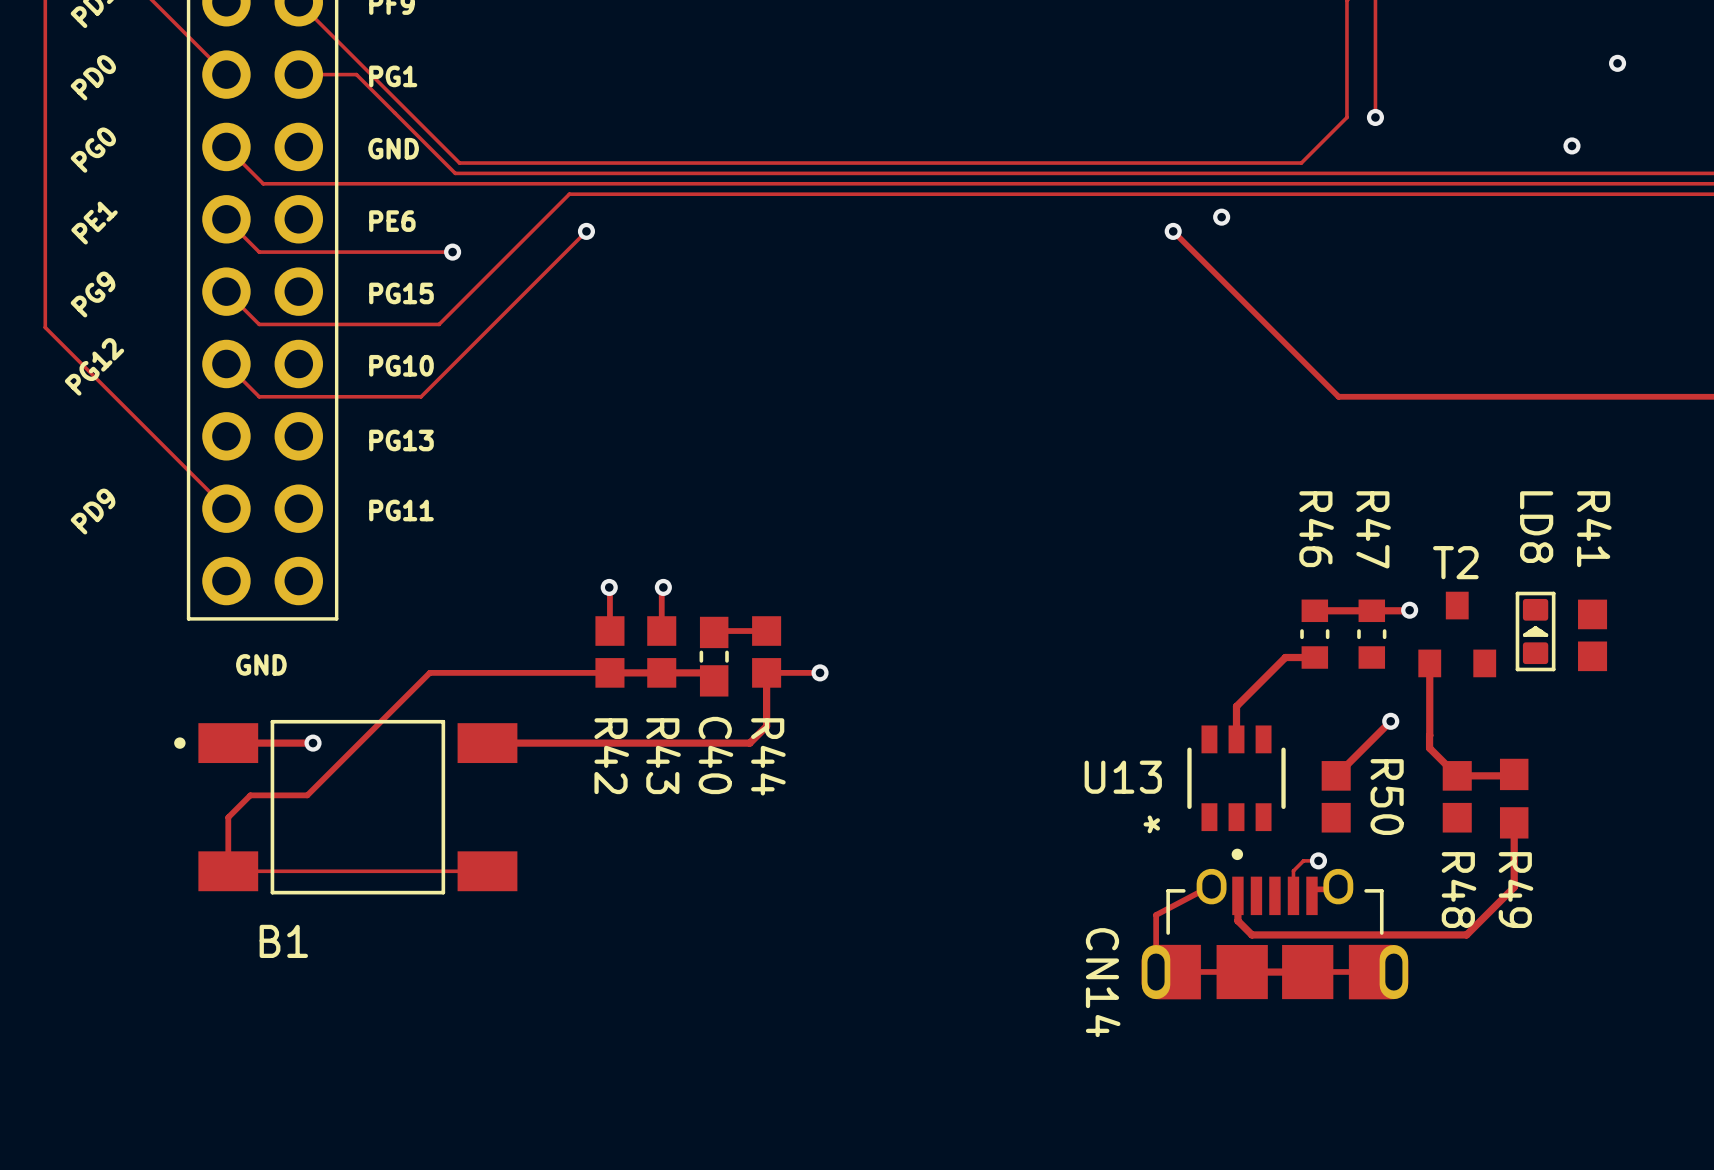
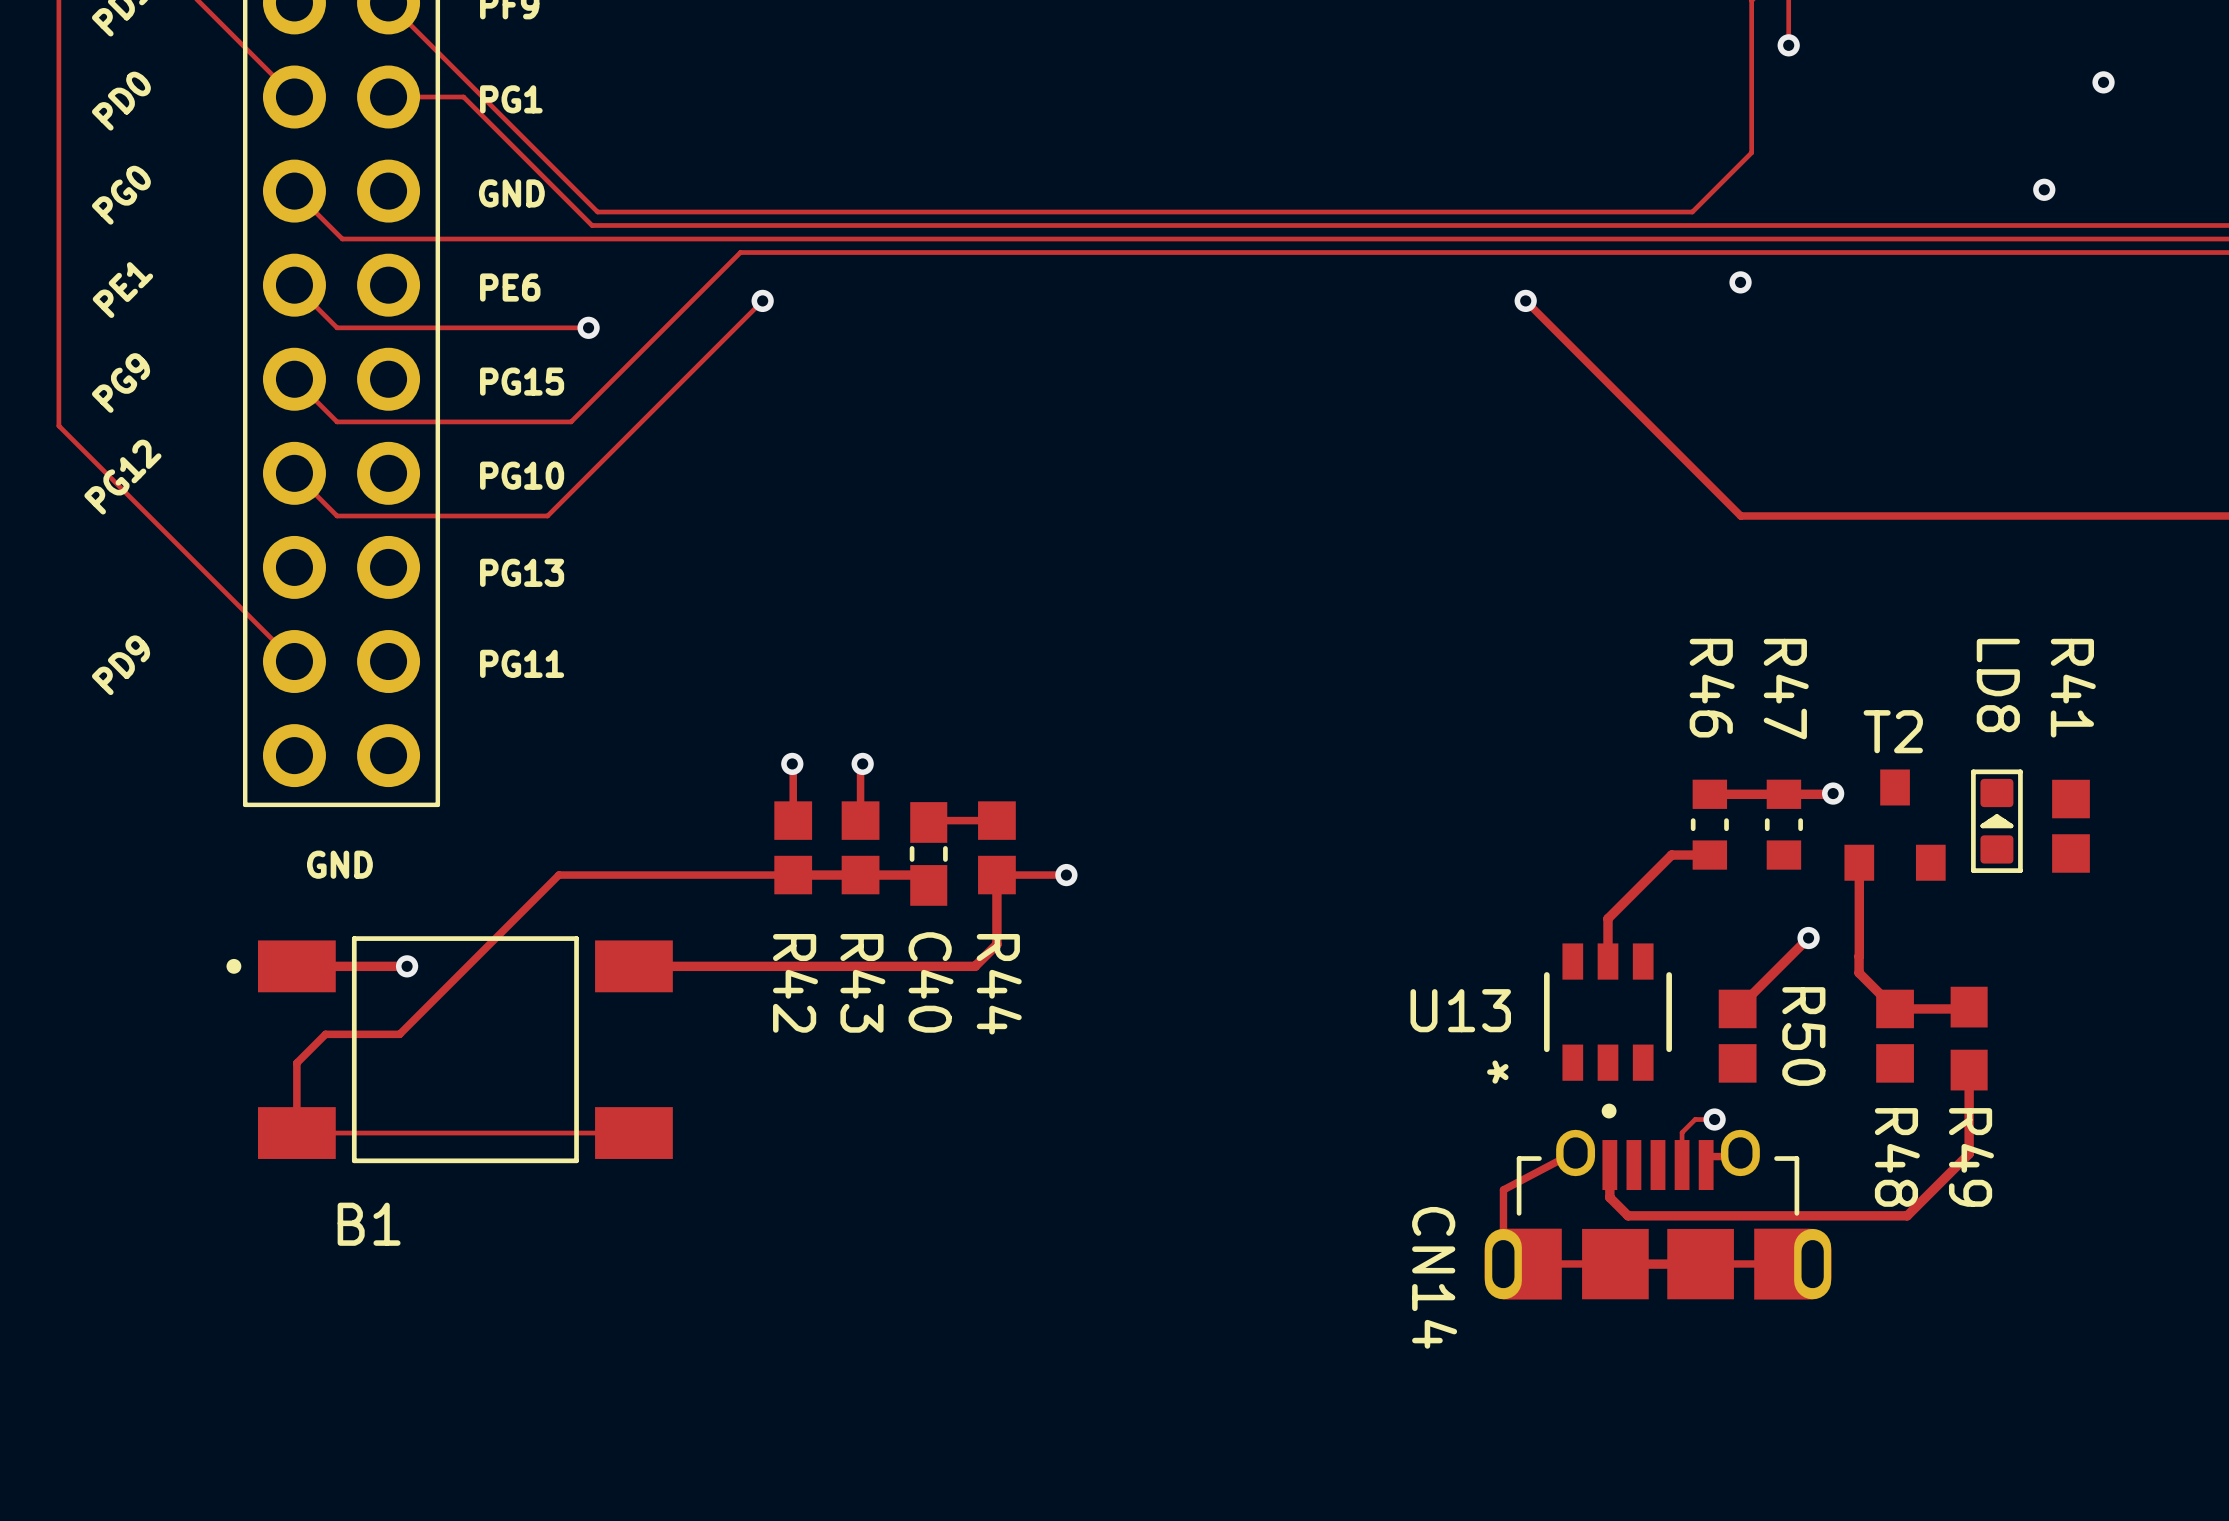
track: (1375, 34) (1375, 117) -> none
via: none -> (1788, 45)
via: (1375, 117) -> none
via: (1221, 217) -> none
via: none -> (1740, 282)

